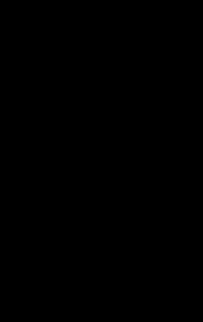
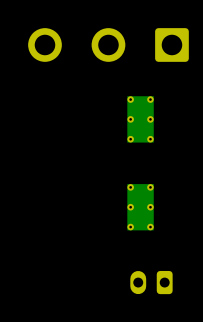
part: none -> (108, 44)
part: none -> (140, 119)
part: none -> (140, 207)
part: none -> (151, 282)

